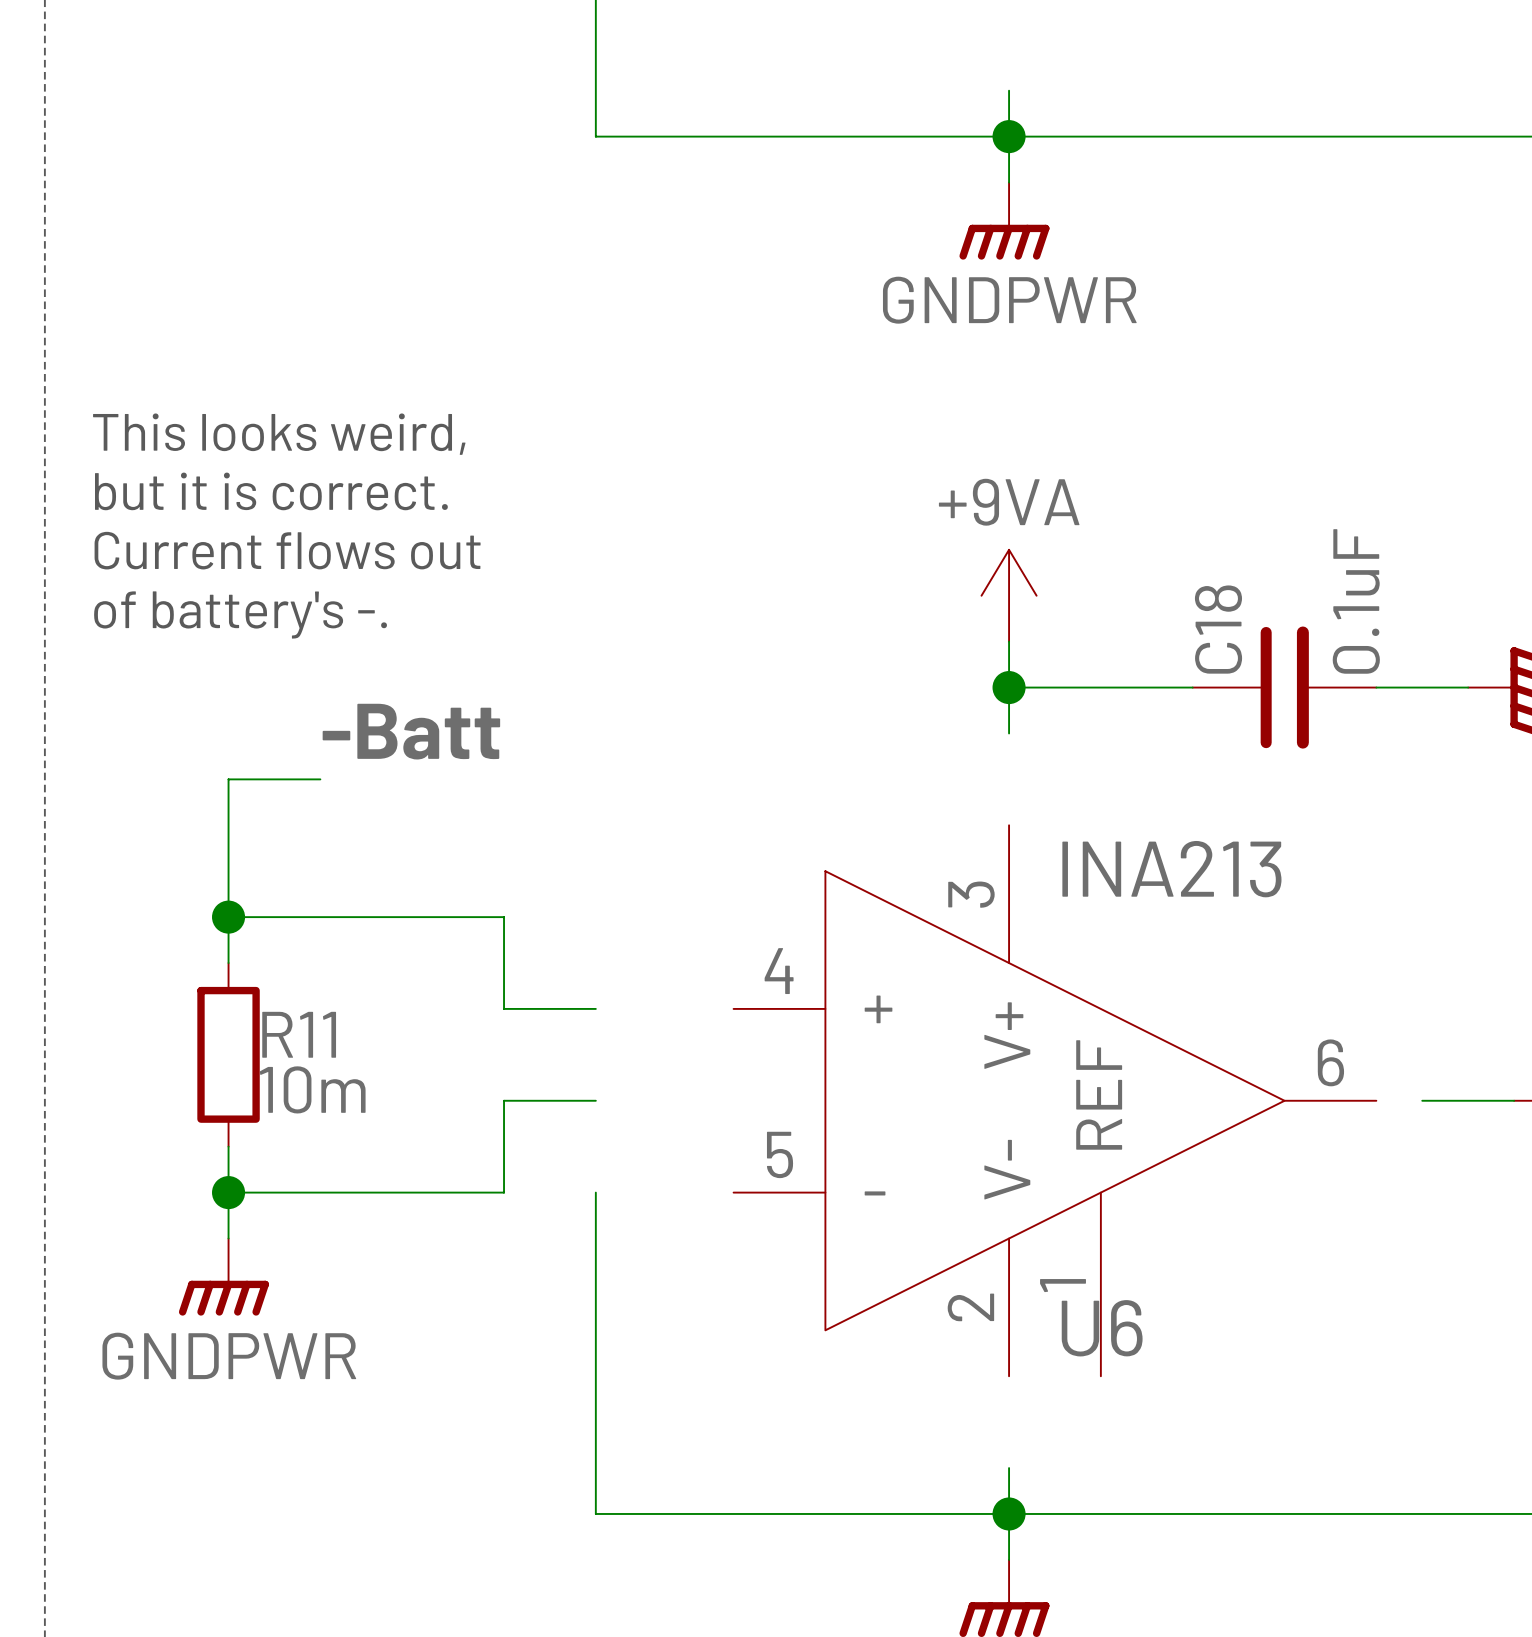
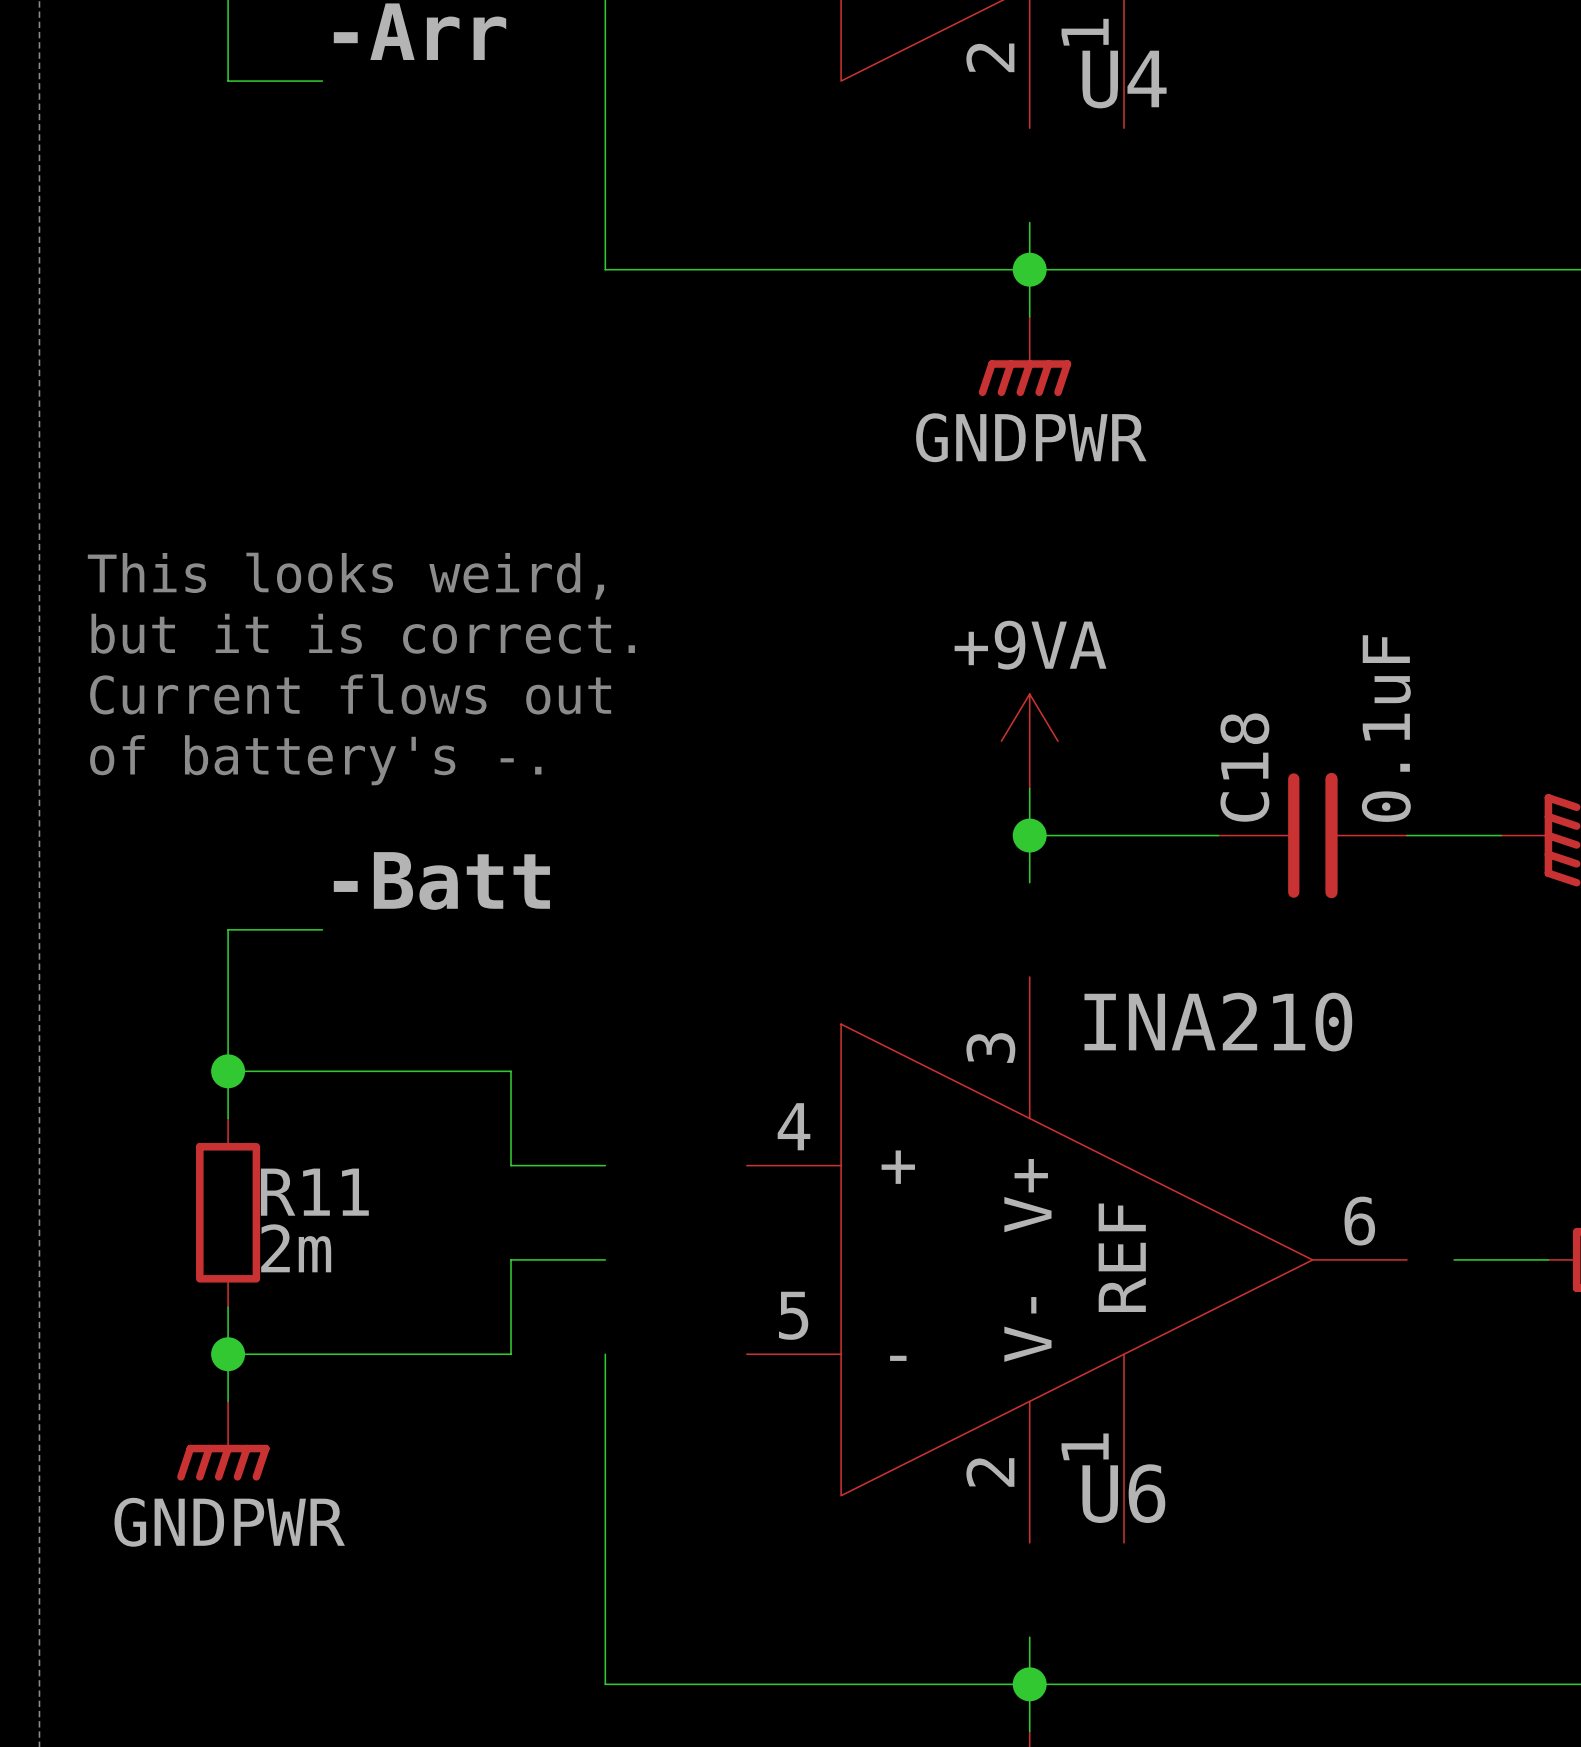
U6 value: INA213 (1171, 869) -> INA210 (1218, 1022)
R11 value: 10m (312, 1089) -> 2m (296, 1248)

